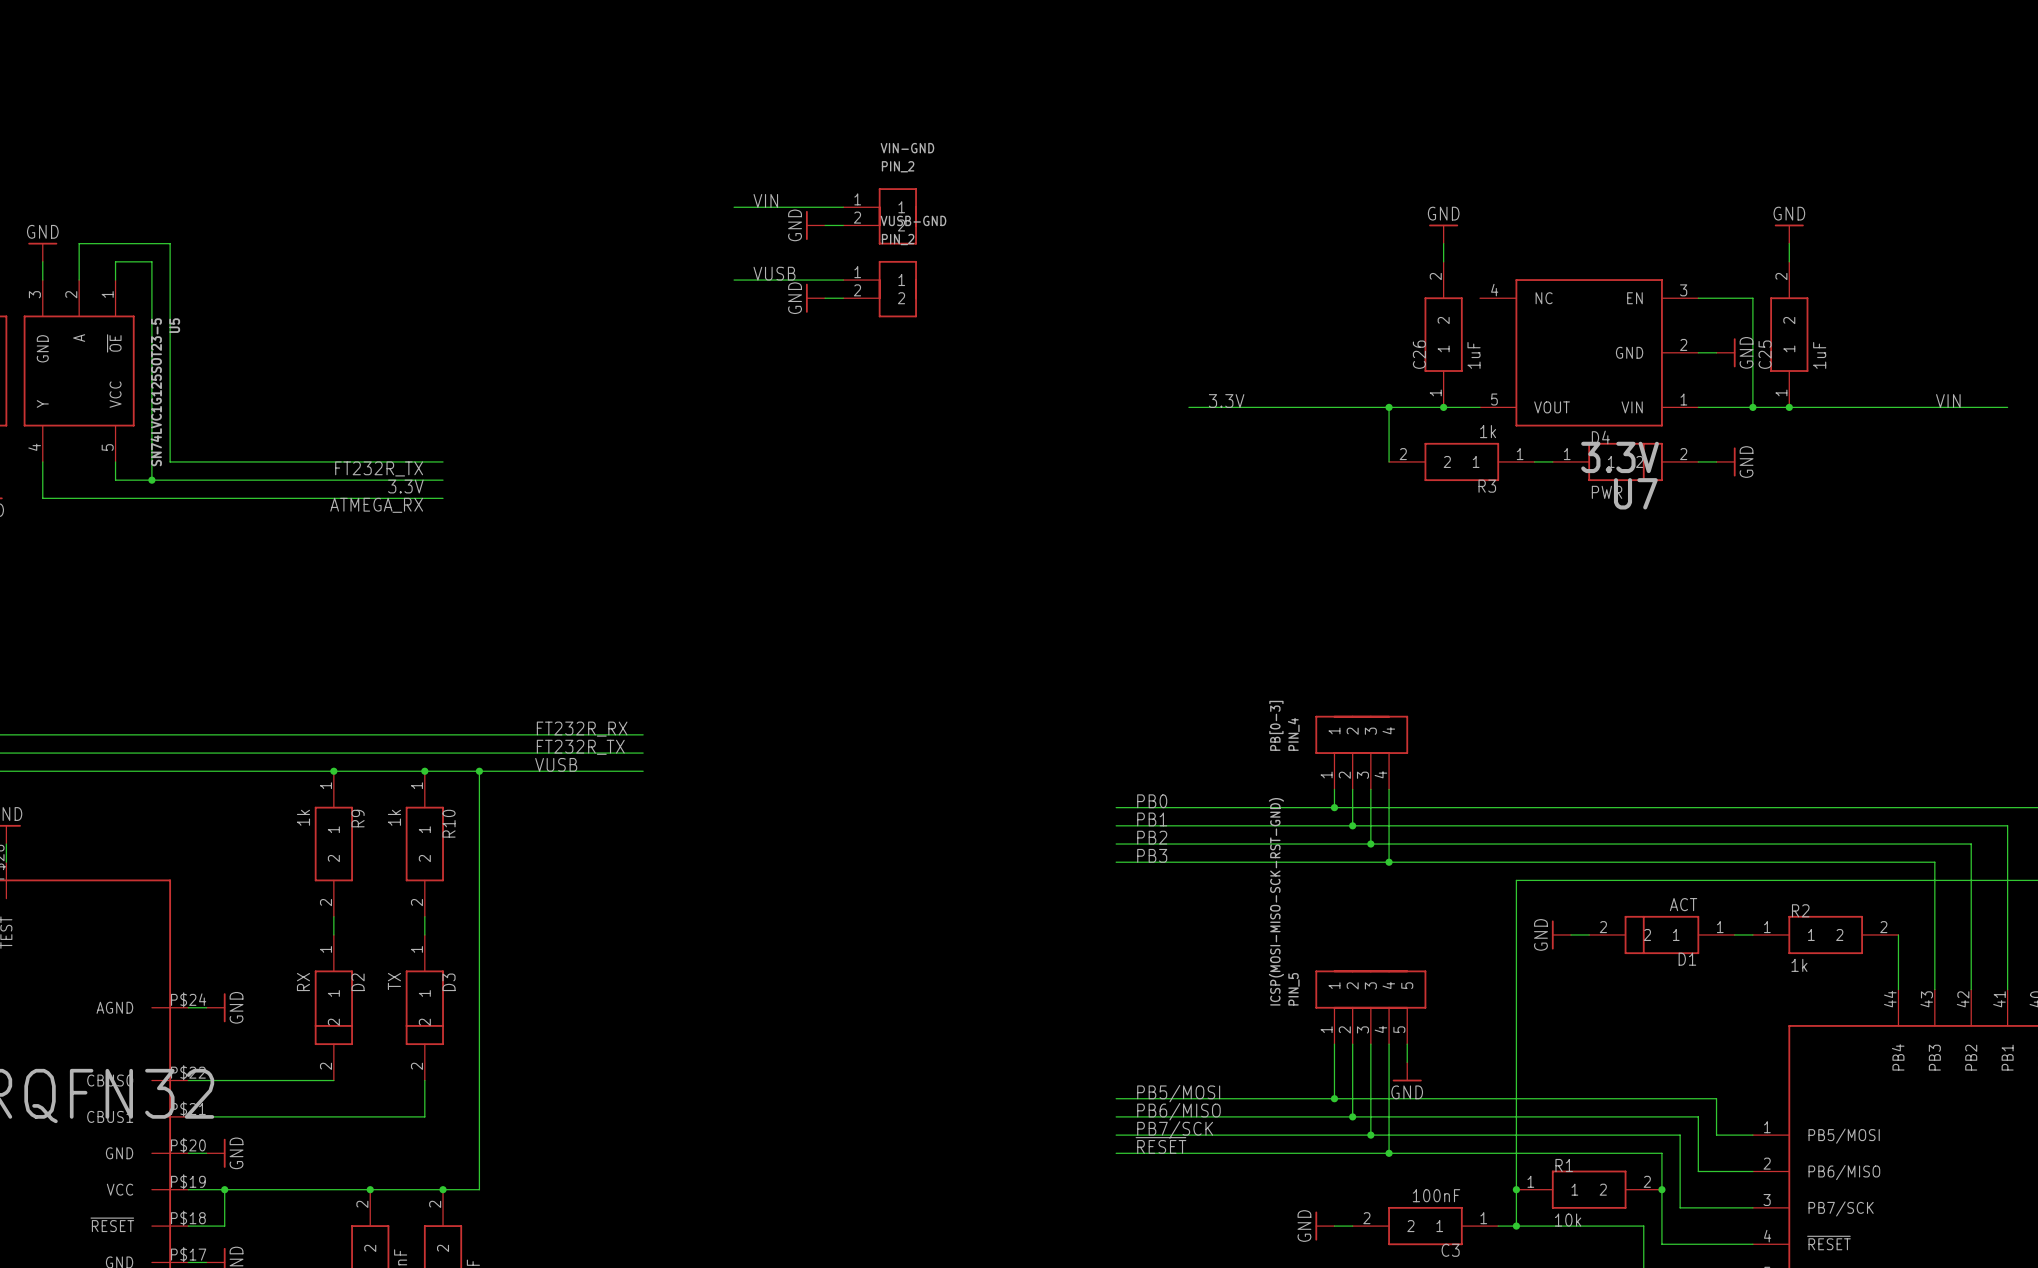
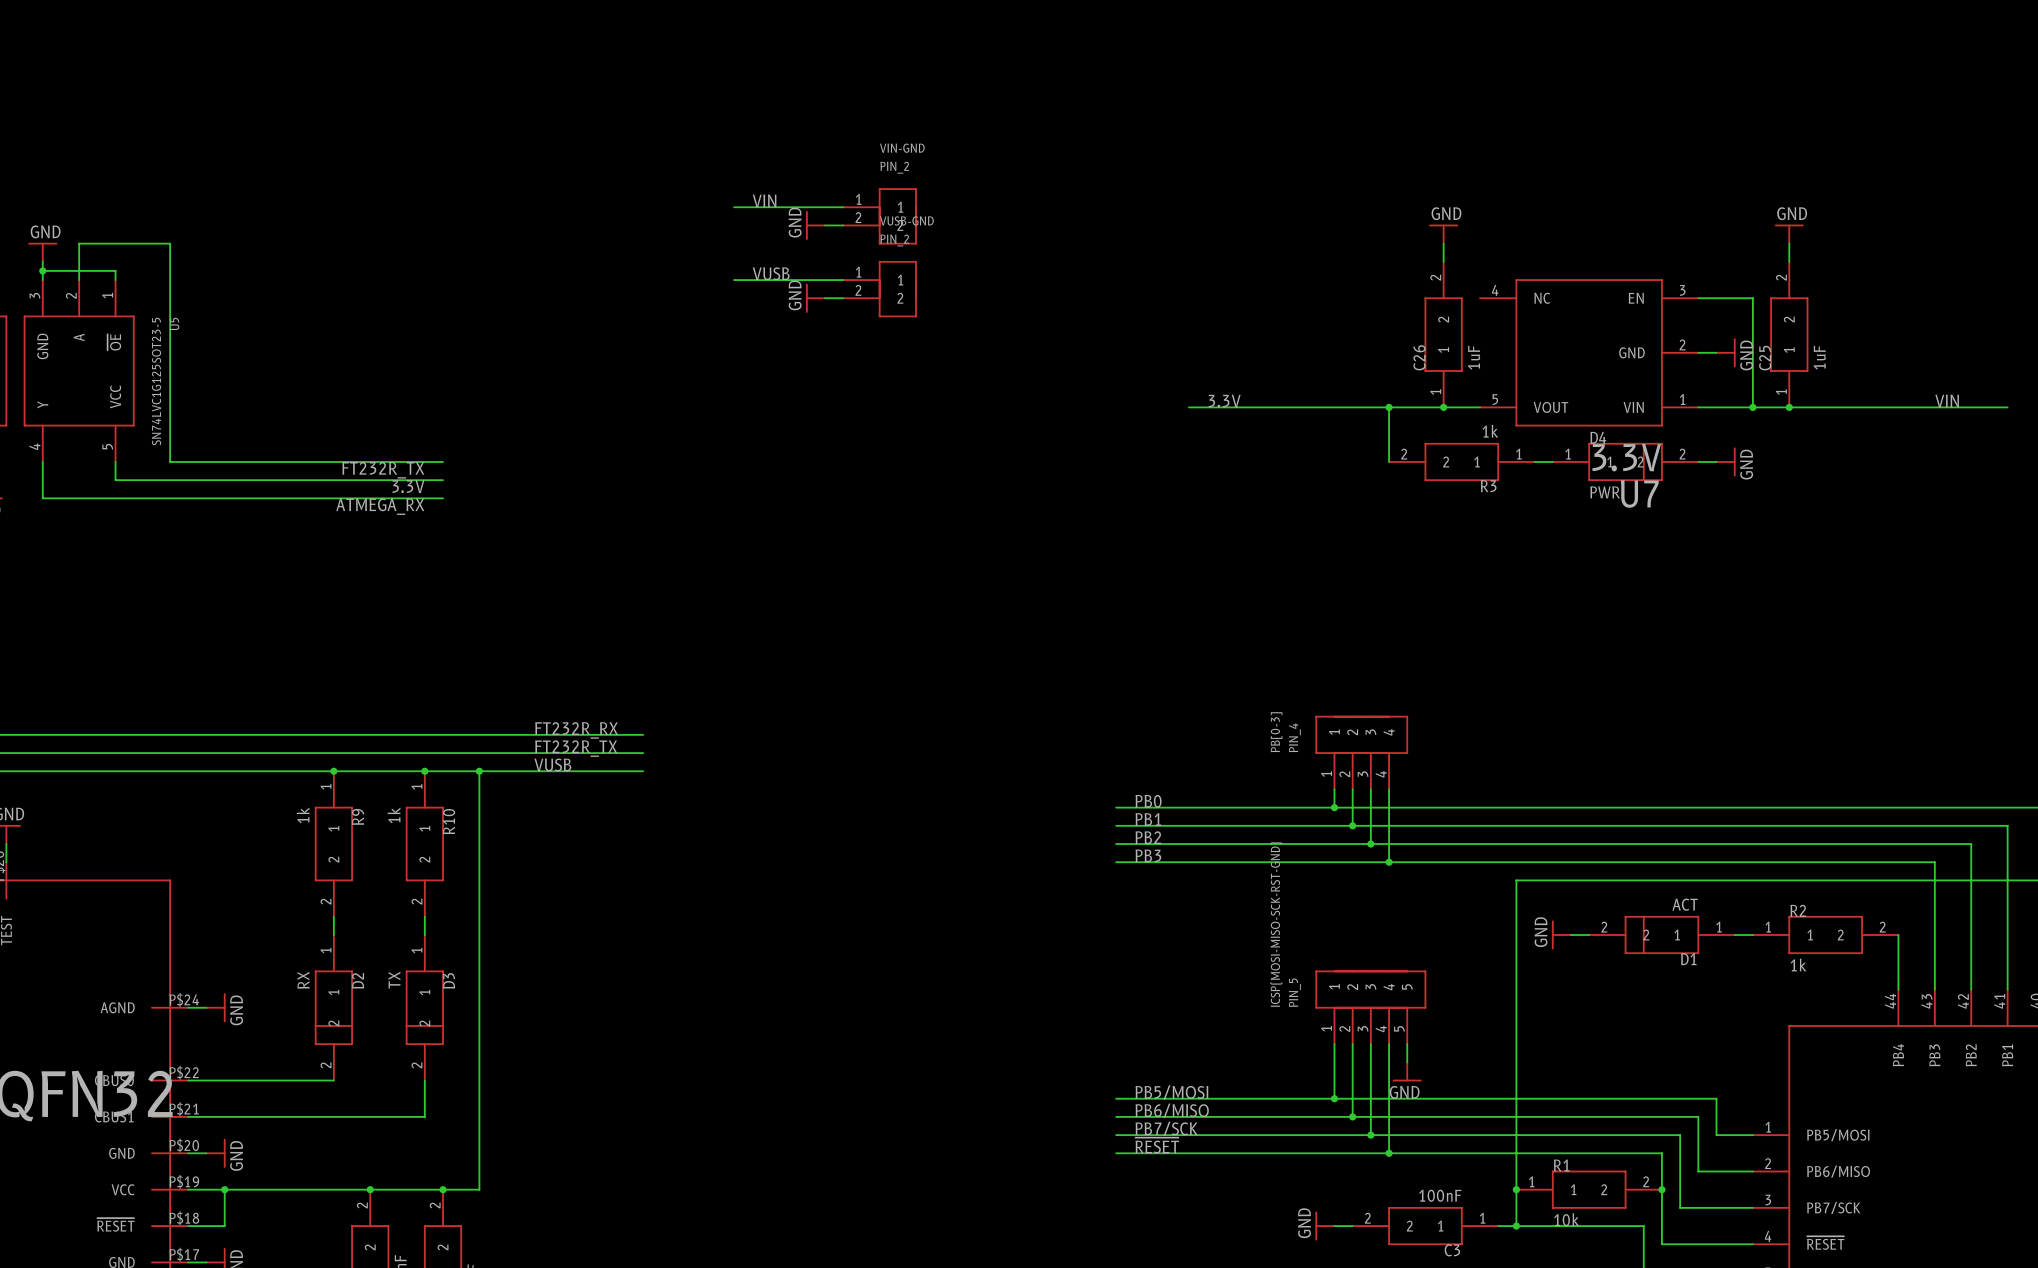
junction: none -> (42, 270)
wire: (115, 270) (115, 261) (151, 261) (151, 480) -> (115, 270) (42, 270)
junction: (151, 480) -> none

